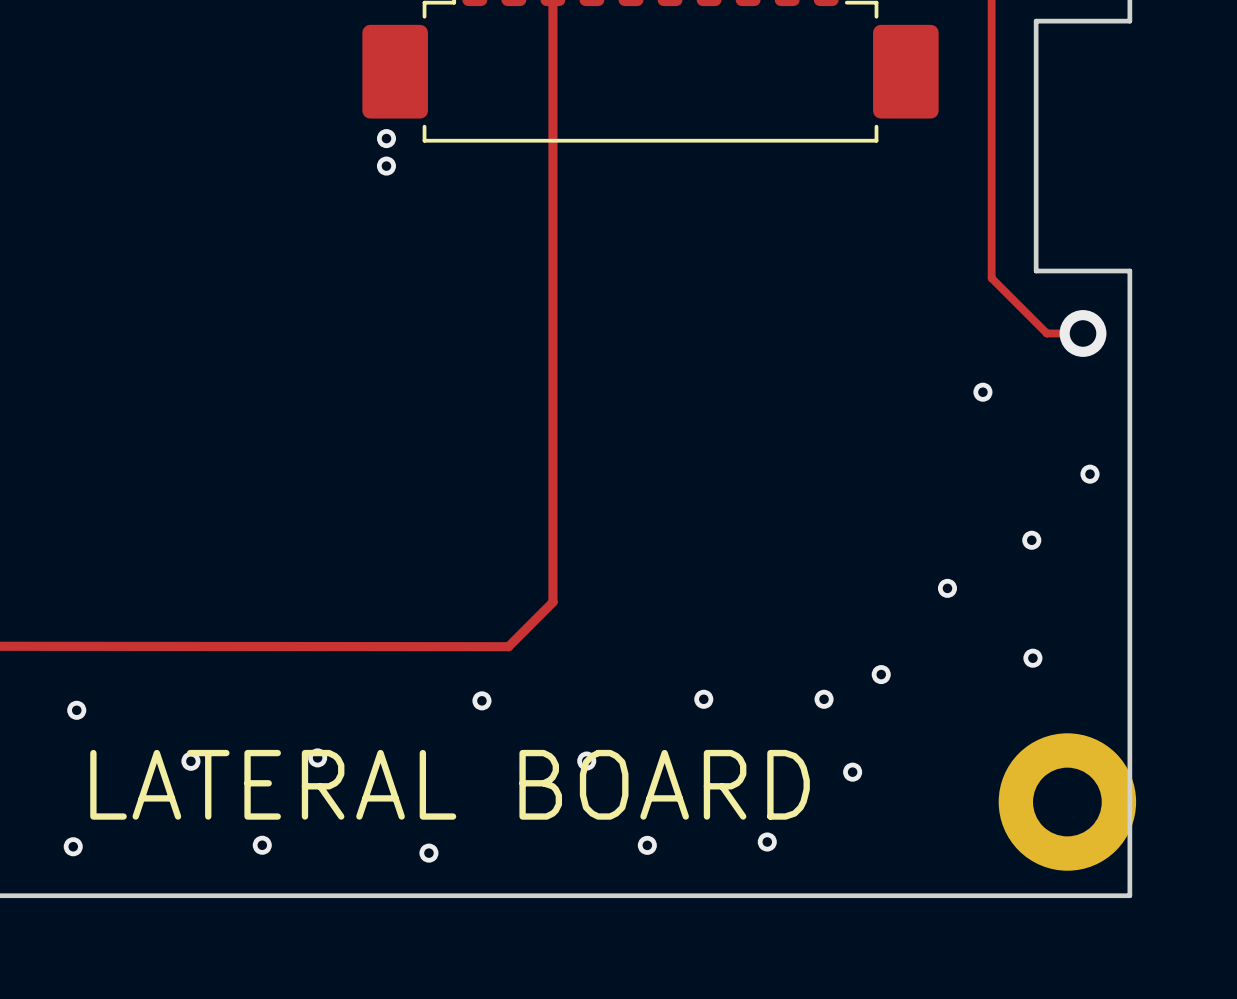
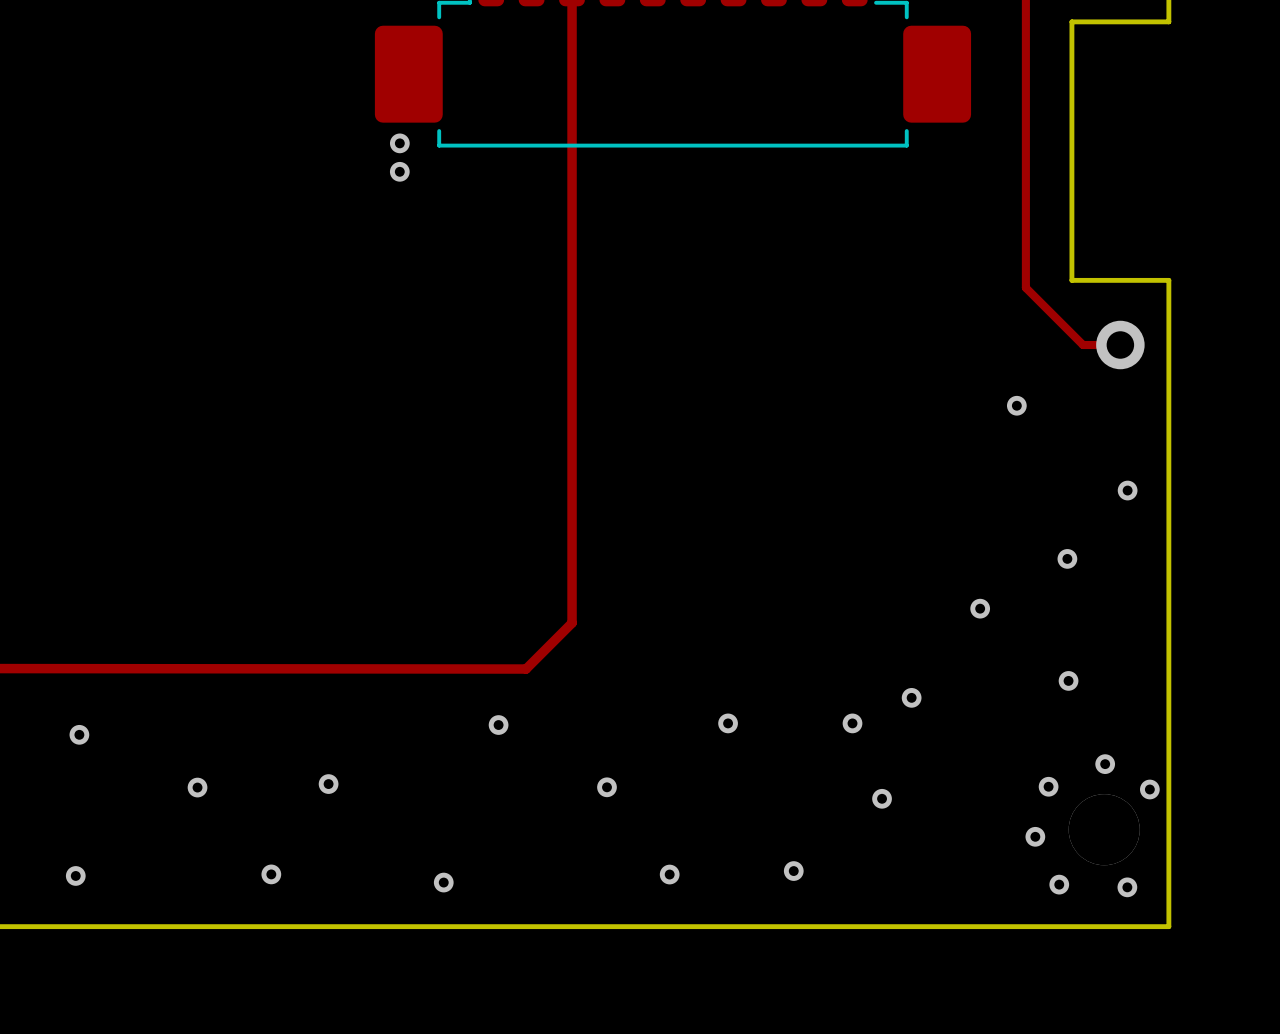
via: none -> (1105, 764)
via: none -> (1048, 786)
via: none -> (1149, 789)
text: LATERAL BOARD (450, 784) -> none
part: (1067, 802) -> none
via: none -> (1035, 836)
via: none -> (1059, 884)
via: none -> (1127, 887)

